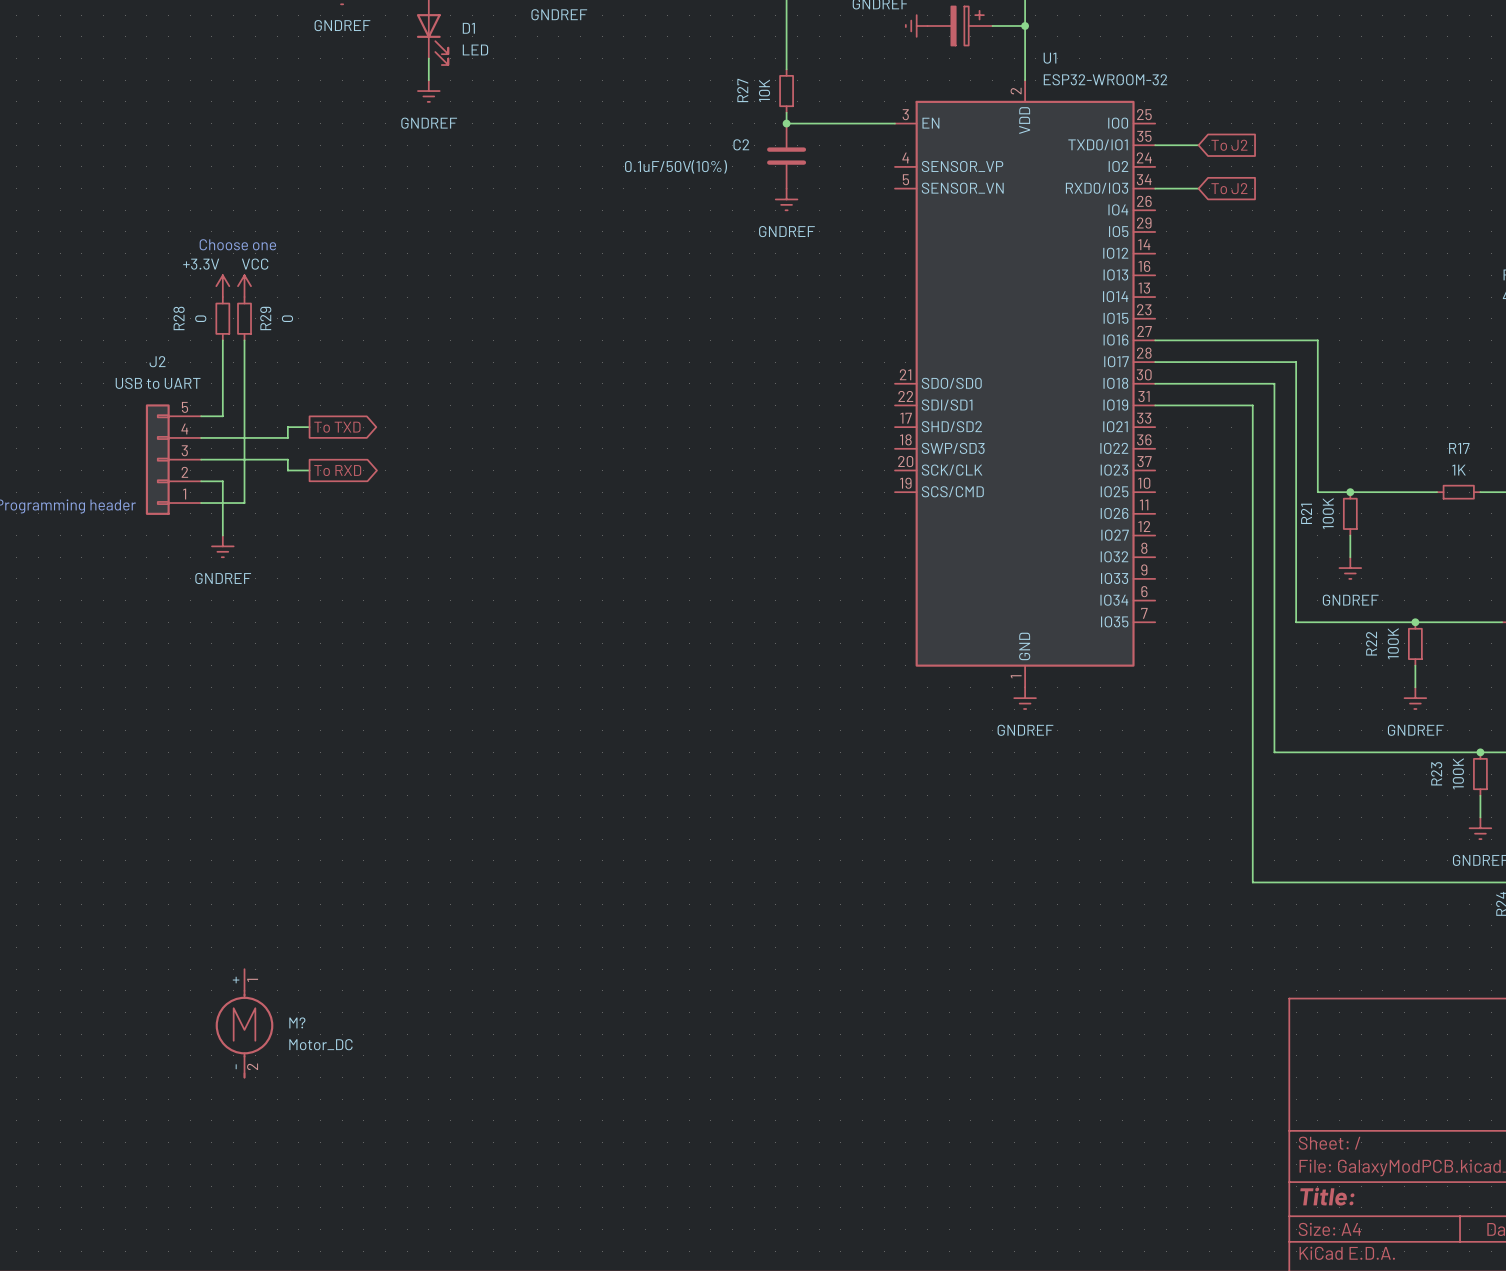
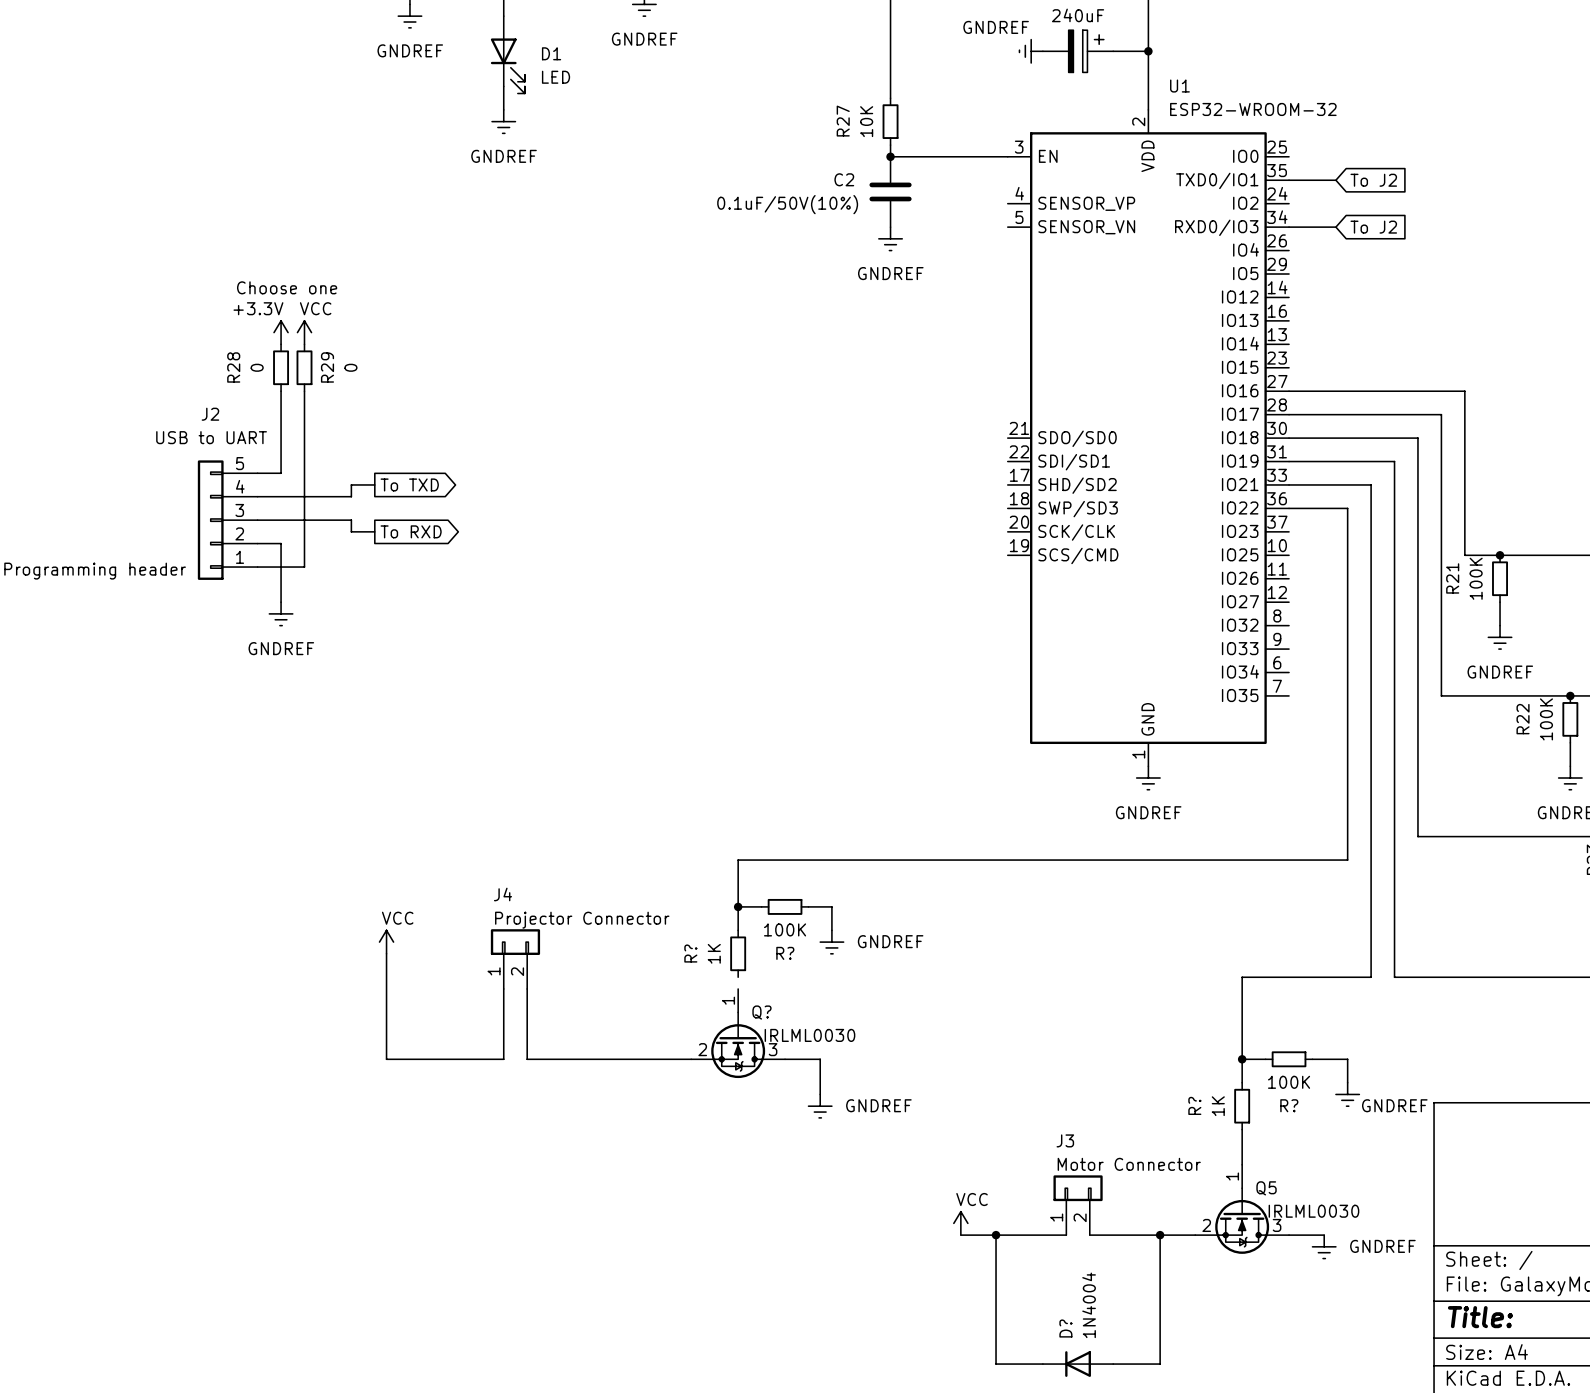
wire: none -> (1289, 484) (1371, 484) (1371, 977) (1242, 977) (1242, 1082)
wire: none -> (1289, 508) (1347, 508) (1347, 860) (738, 860) (738, 930)
wire: none -> (738, 906) (761, 906)
junction: none -> (738, 906)
R?: none -> 100K (785, 906)
wire: none -> (808, 906) (831, 906) (831, 930)
power symbol: none -> VCC (386, 942)
power symbol: none -> GNDREF (831, 942)
wire: none -> (386, 953) (386, 1059) (503, 1059) (503, 988)
R?: none -> 1K (738, 953)
J4: none -> Projector Connector (515, 959)
wire: none -> (527, 988) (527, 1059) (691, 1059)
Q?: none -> IRLML0030 (738, 1033)
wire: none -> (785, 1059) (820, 1059) (820, 1094)
wire: none -> (1242, 1059) (1265, 1059)
junction: none -> (1242, 1059)
R?: none -> 100K (1289, 1059)
wire: none -> (1312, 1059) (1347, 1059) (1347, 1082)
power symbol: none -> GNDREF (1347, 1094)
power symbol: none -> GNDREF (820, 1106)
R?: none -> 1K (1242, 1106)
M?: Motor_DC (244, 1023) -> none
wire: none -> (1242, 1129) (1242, 1164)
J3: none -> Motor Connector (1078, 1205)
Q5: none -> IRLML0030 (1242, 1209)
power symbol: none -> VCC (960, 1223)
wire: none -> (960, 1235) (1066, 1235)
wire: none -> (996, 1235) (996, 1364) (1042, 1364)
junction: none -> (996, 1235)
wire: none -> (1089, 1235) (1195, 1235)
wire: none -> (1160, 1235) (1160, 1364) (1113, 1364)
junction: none -> (1160, 1235)
wire: none -> (1289, 1235) (1324, 1235)
power symbol: none -> GNDREF (1324, 1246)
D?: none -> 1N4004 (1078, 1364)

